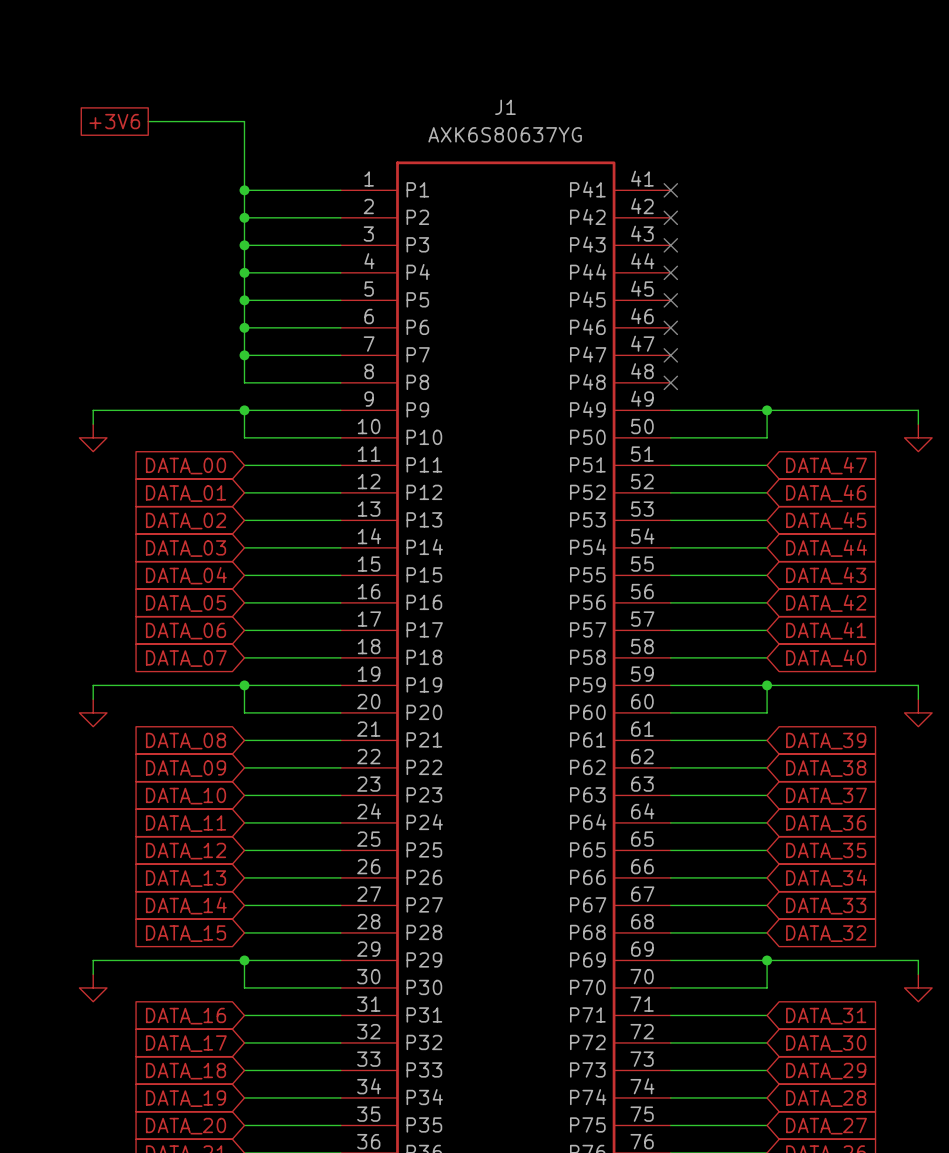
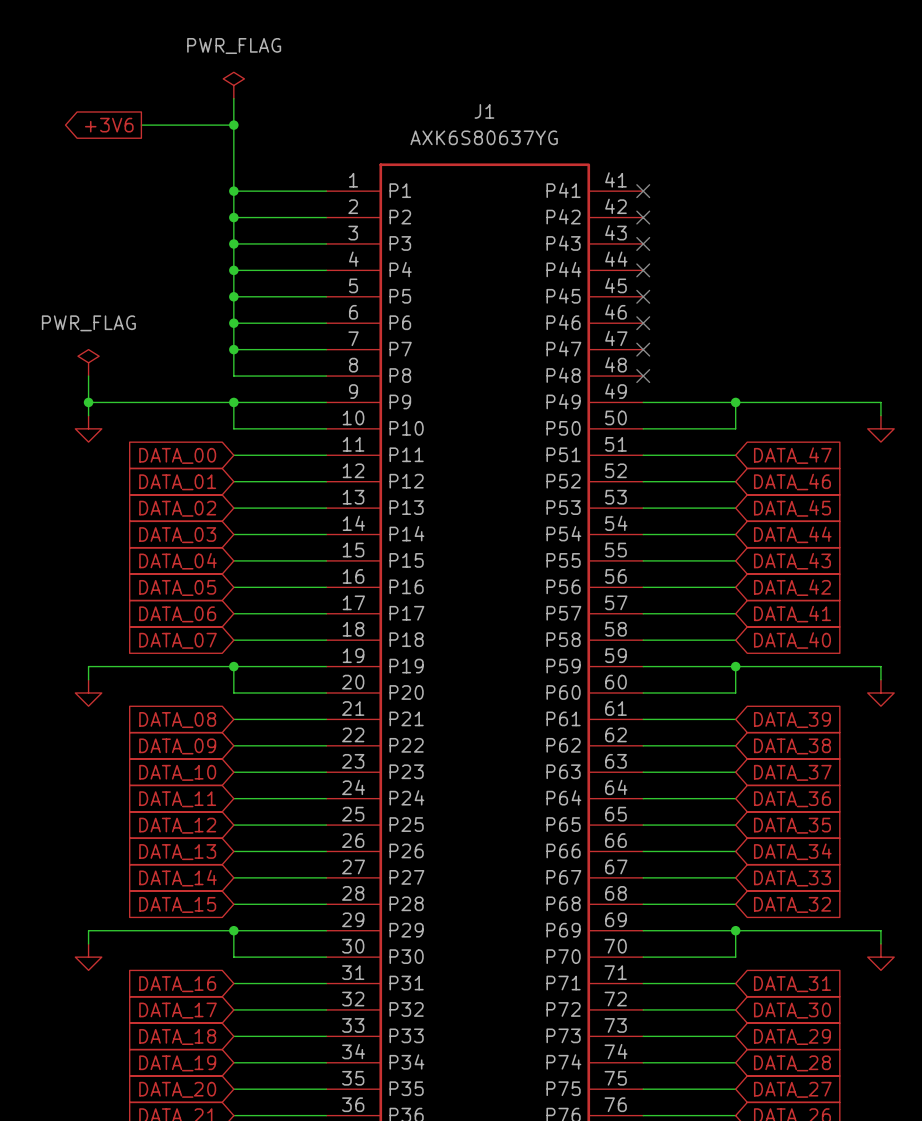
power symbol: none -> PWR_FLAG (233, 85)
wire: none -> (233, 98) (233, 125)
global label shape: passive (114, 121) -> output (109, 125)
junction: none -> (233, 125)
power symbol: none -> PWR_FLAG (88, 362)
wire: none -> (88, 376) (88, 402)
junction: none -> (88, 402)

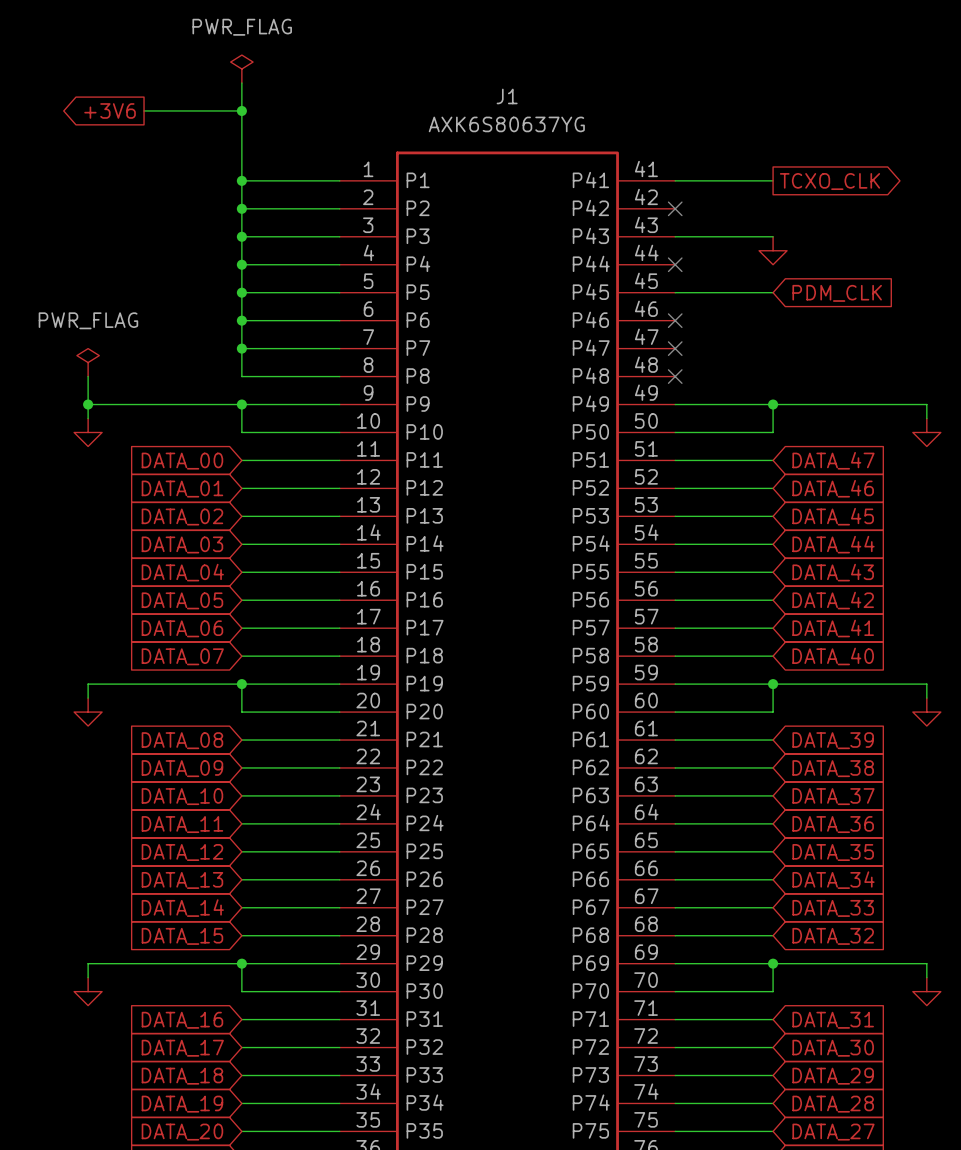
wire: none -> (675, 180) (773, 180)
no-connect mark: (643, 191) -> none
global label: none -> TCXO_CLK (830, 181)
wire: none -> (675, 236) (773, 236)
no-connect mark: (643, 243) -> none
power symbol: none -> (773, 250)
wire: none -> (675, 292) (773, 292)
no-connect mark: (643, 296) -> none
global label: none -> PDM_CLK (837, 293)

